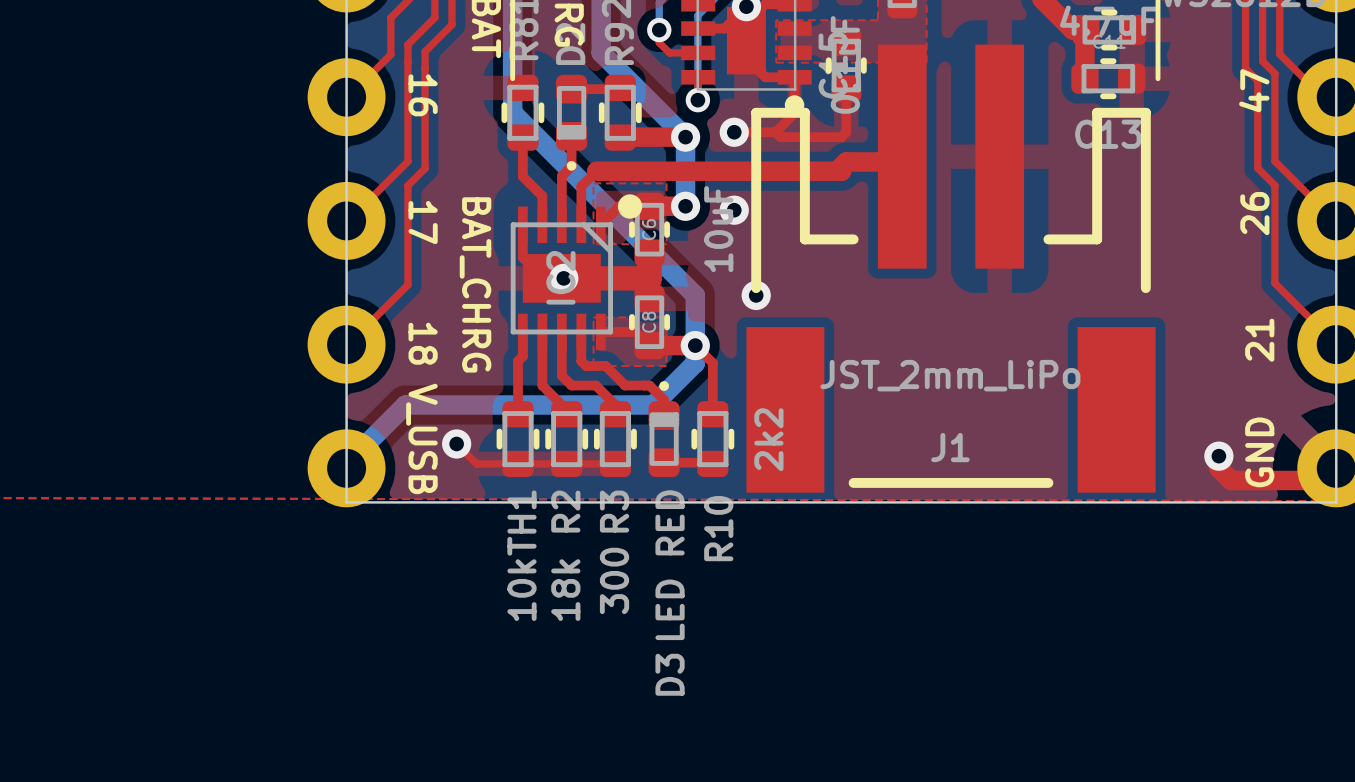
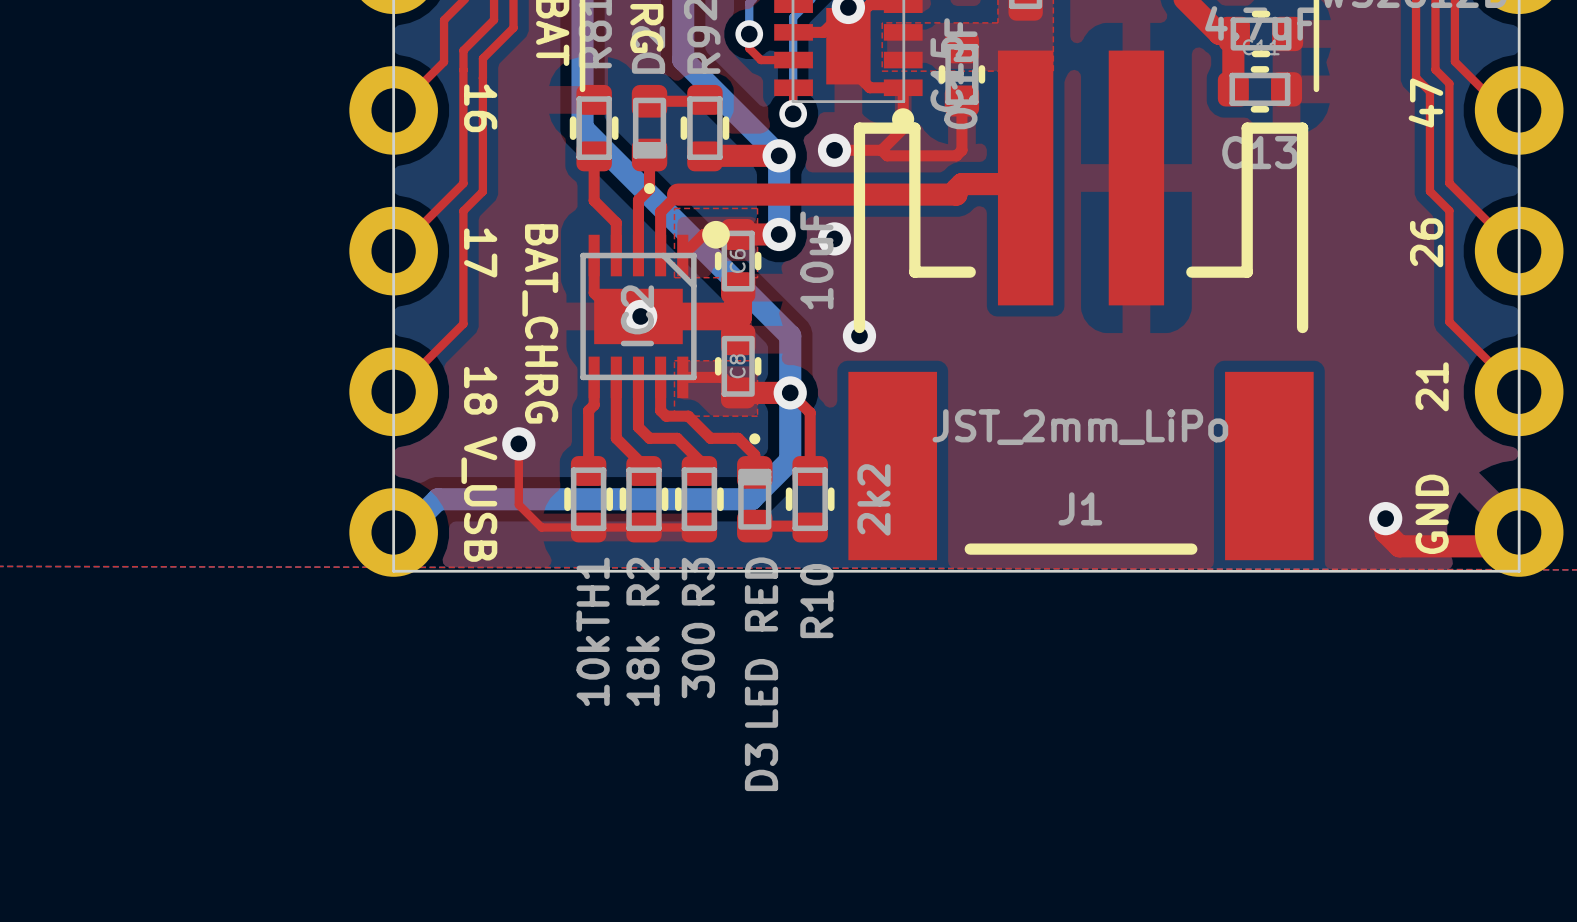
bottom track: (695, 363) (653, 405) (405, 405) (351, 458) -> (790, 412) (790, 460) (751, 499) (438, 499) (404, 532)
top track: none -> (518, 443) (518, 504)
via position: (456, 443) -> (518, 443)

